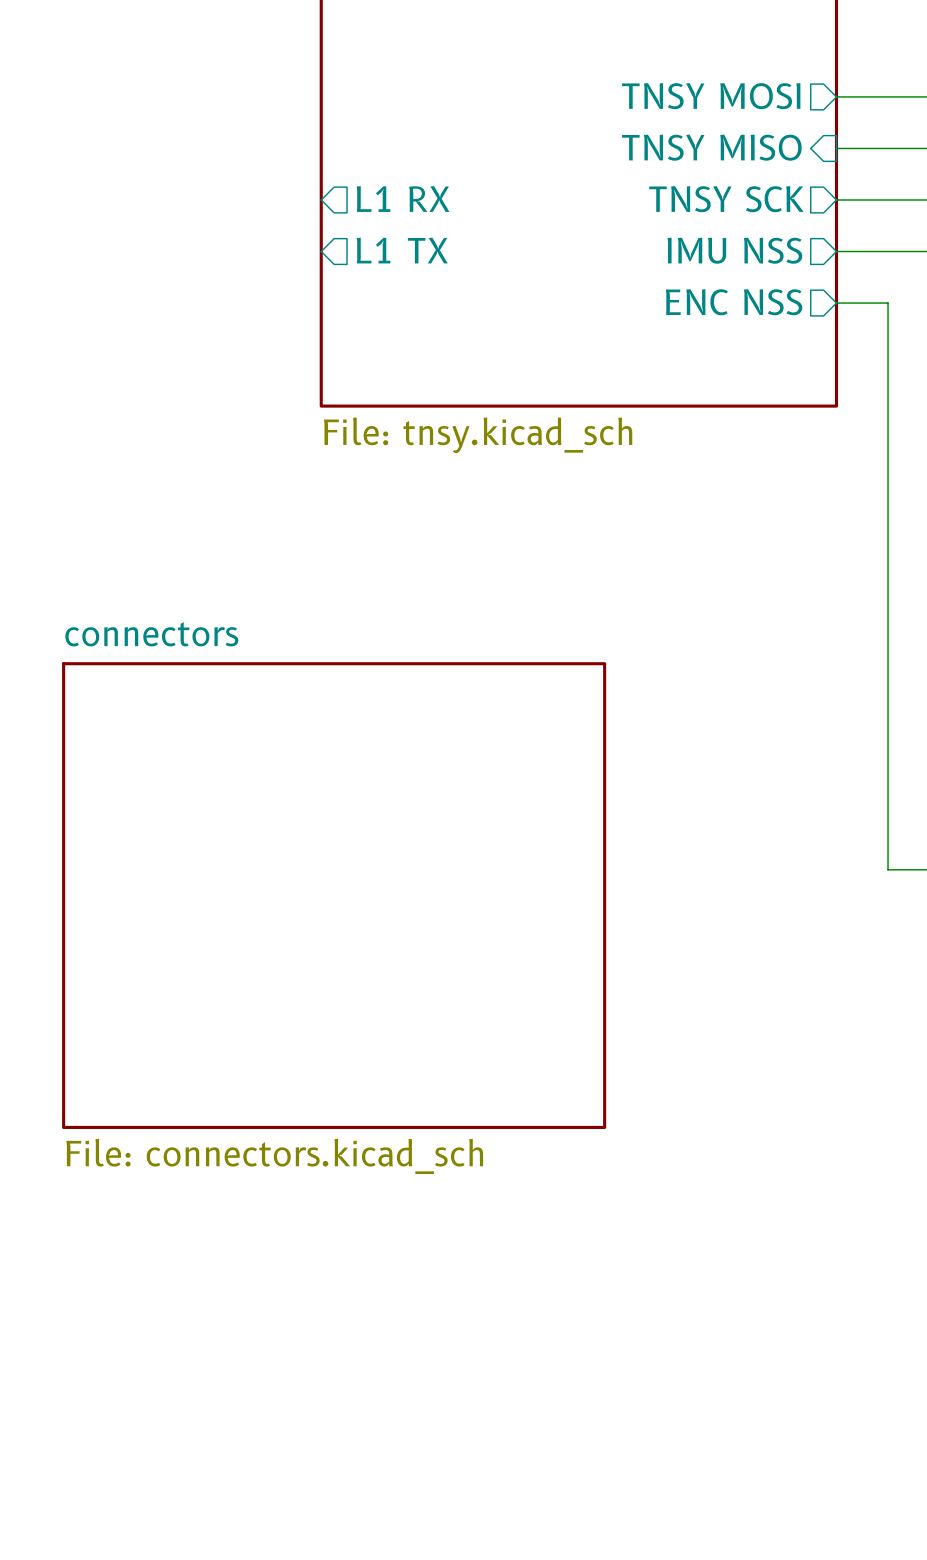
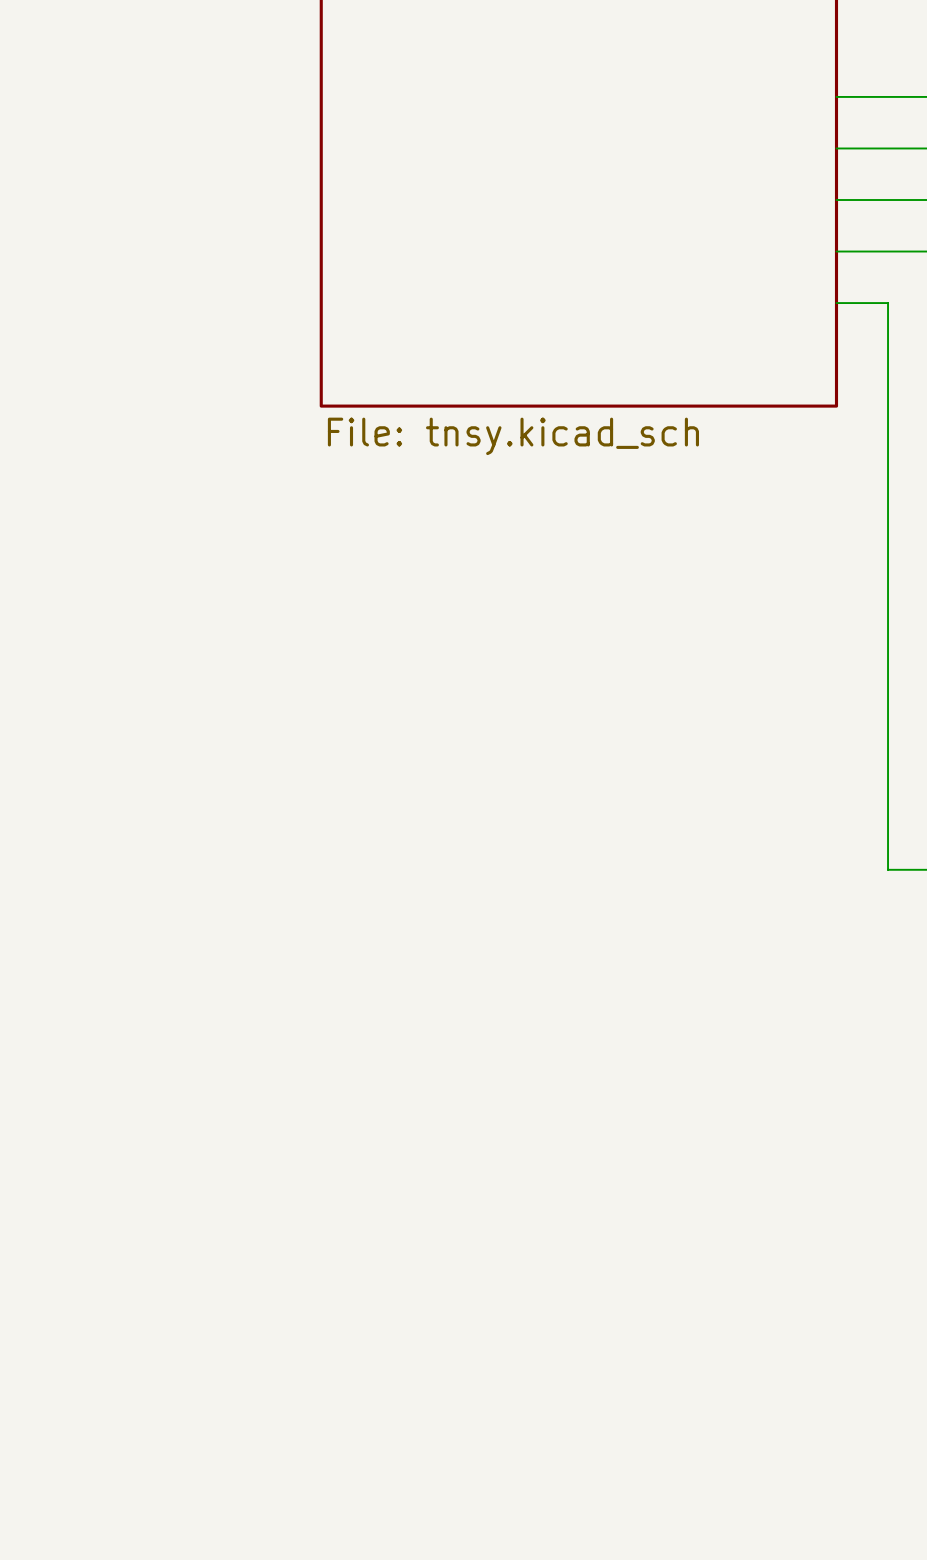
sheet pin: TNSY MOSI (711, 96) -> none
sheet pin: TNSY MISO (711, 147) -> none
sheet pin: L1 RX (403, 199) -> none
sheet pin: TNSY SCK (726, 199) -> none
sheet pin: L1 TX (402, 250) -> none
sheet pin: IMU NSS (734, 250) -> none
sheet pin: ENC NSS (734, 302) -> none
sheet connectors: File: connectors.kicad_sch (334, 895) -> none

